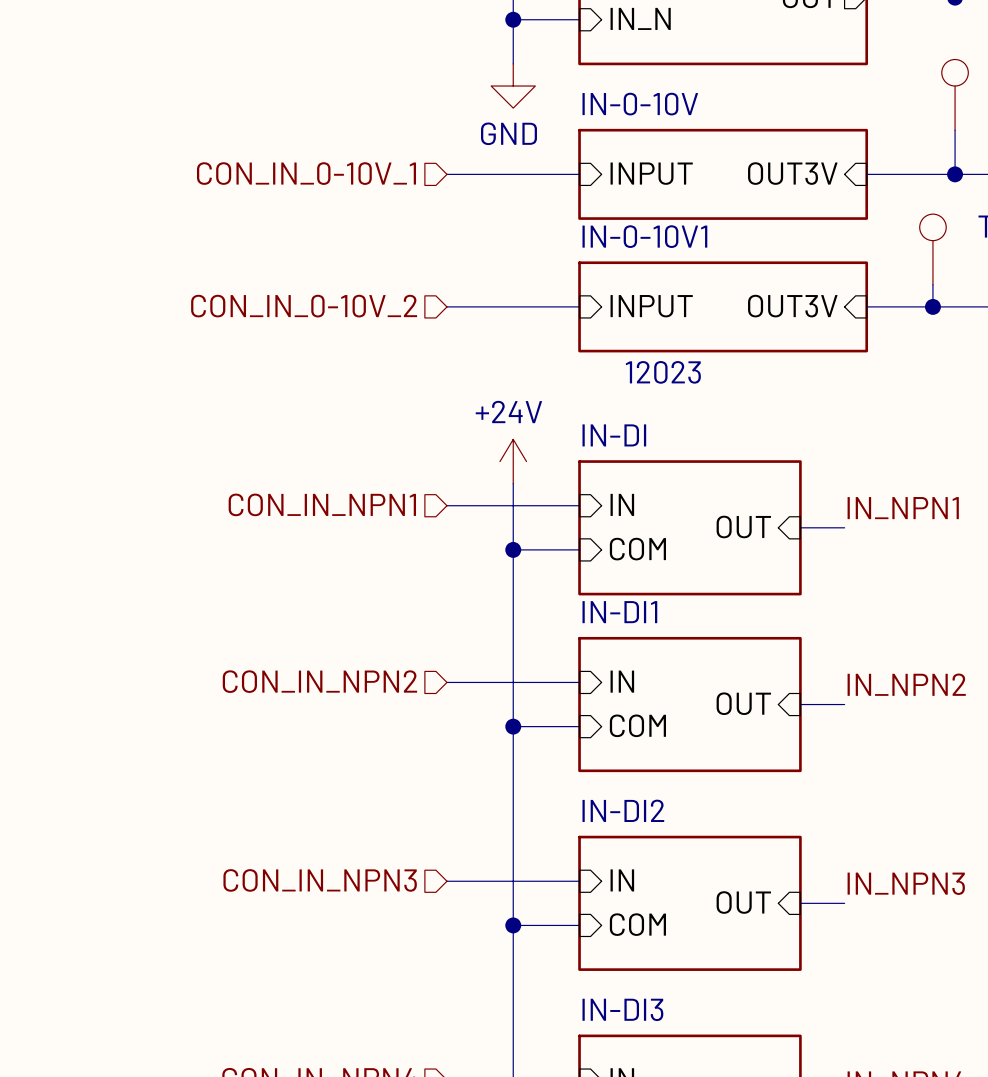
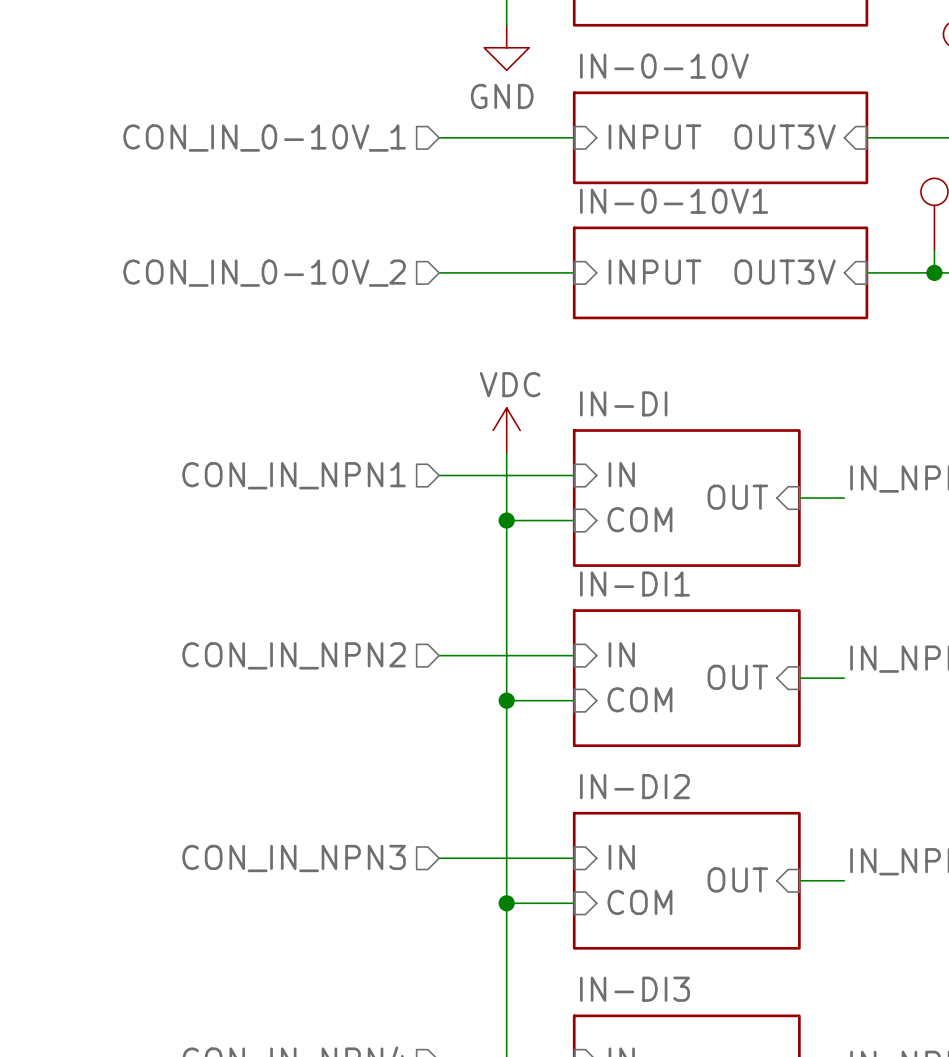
sheet IN-0-10V1 text: 12023 (663, 372) -> none
power symbol: +24V (513, 461) -> VDC (506, 430)

